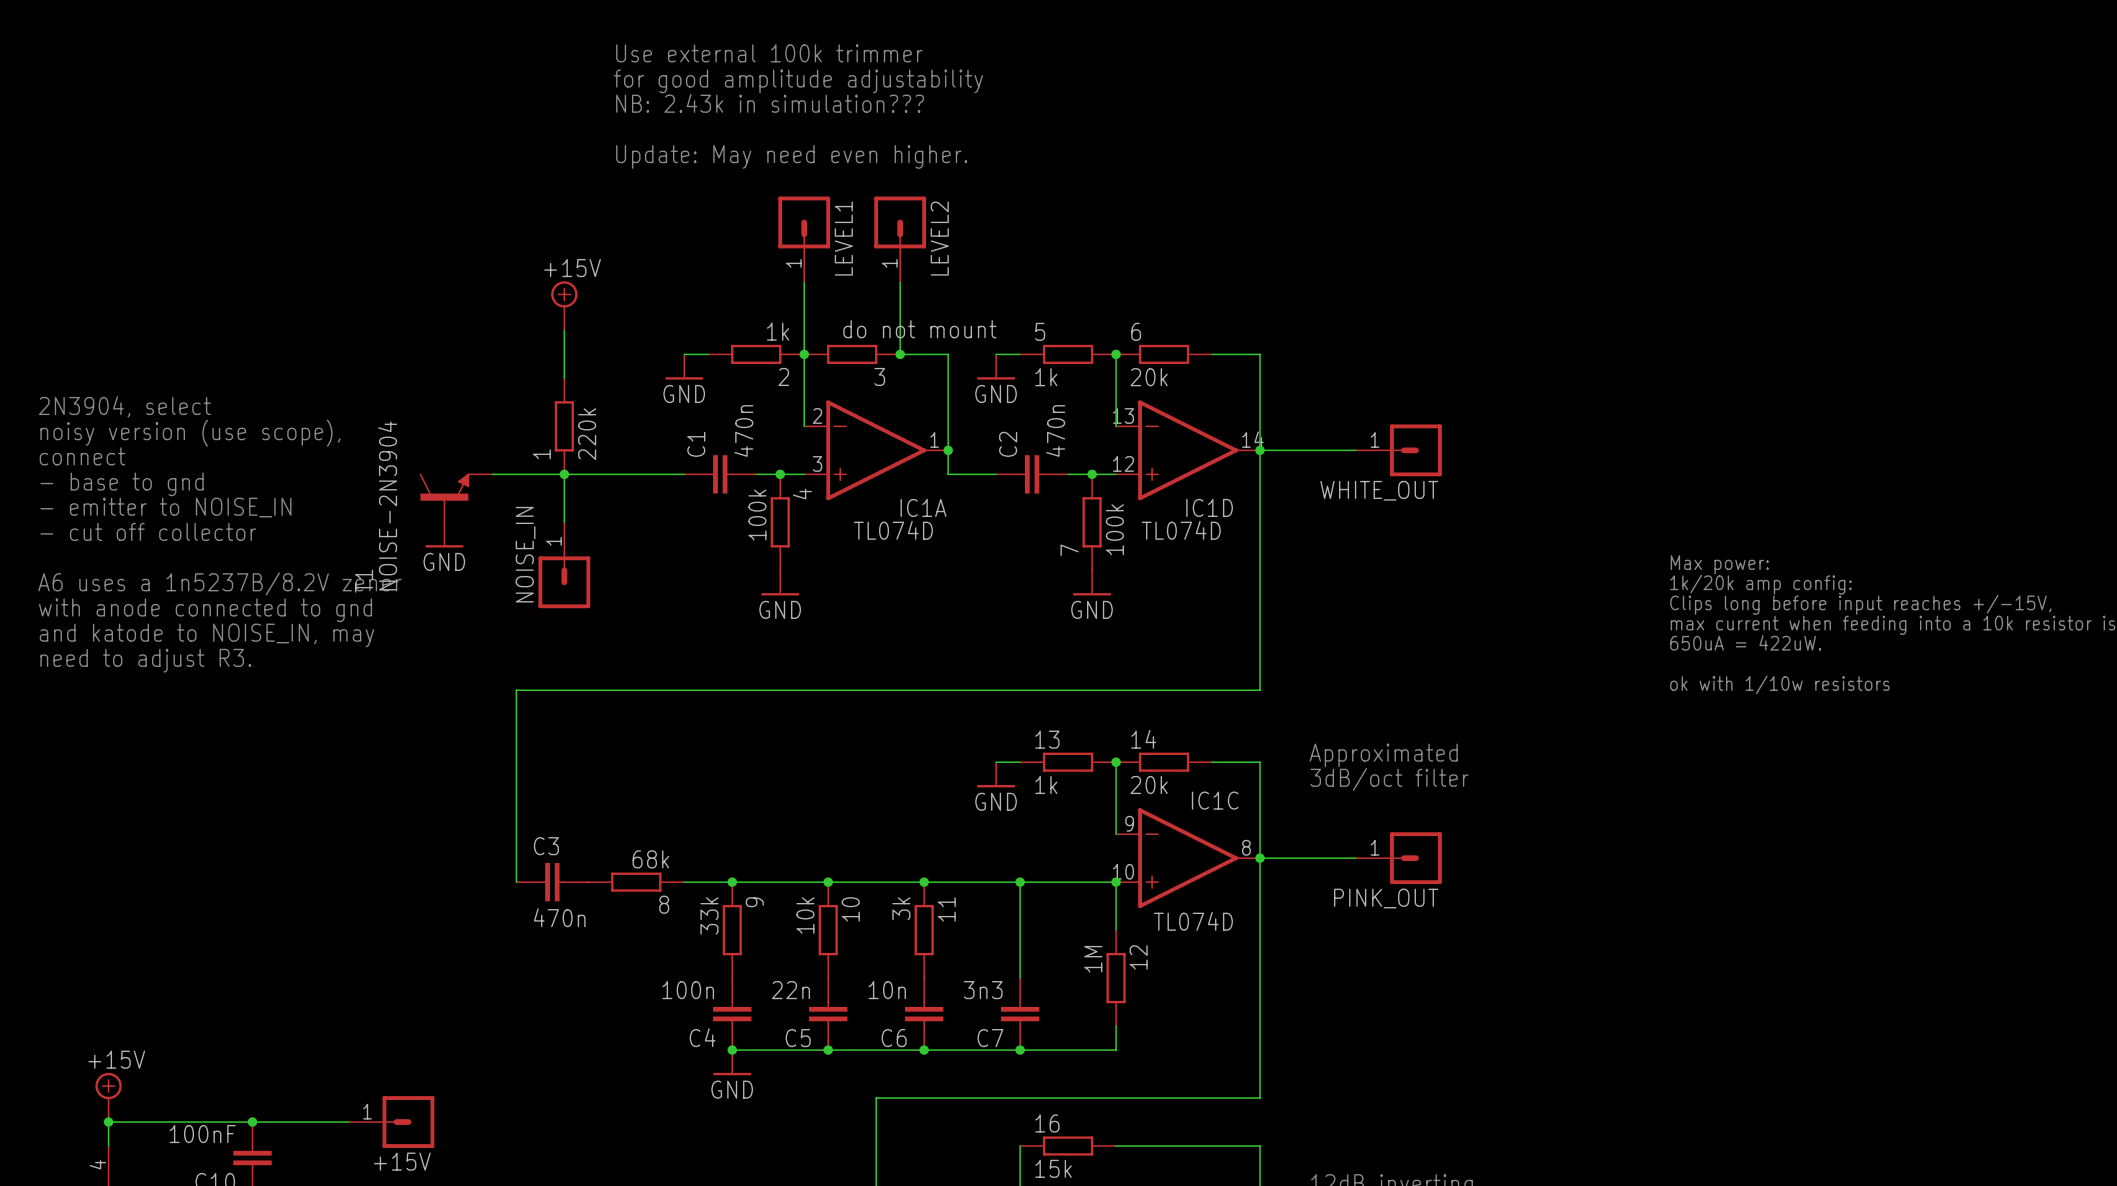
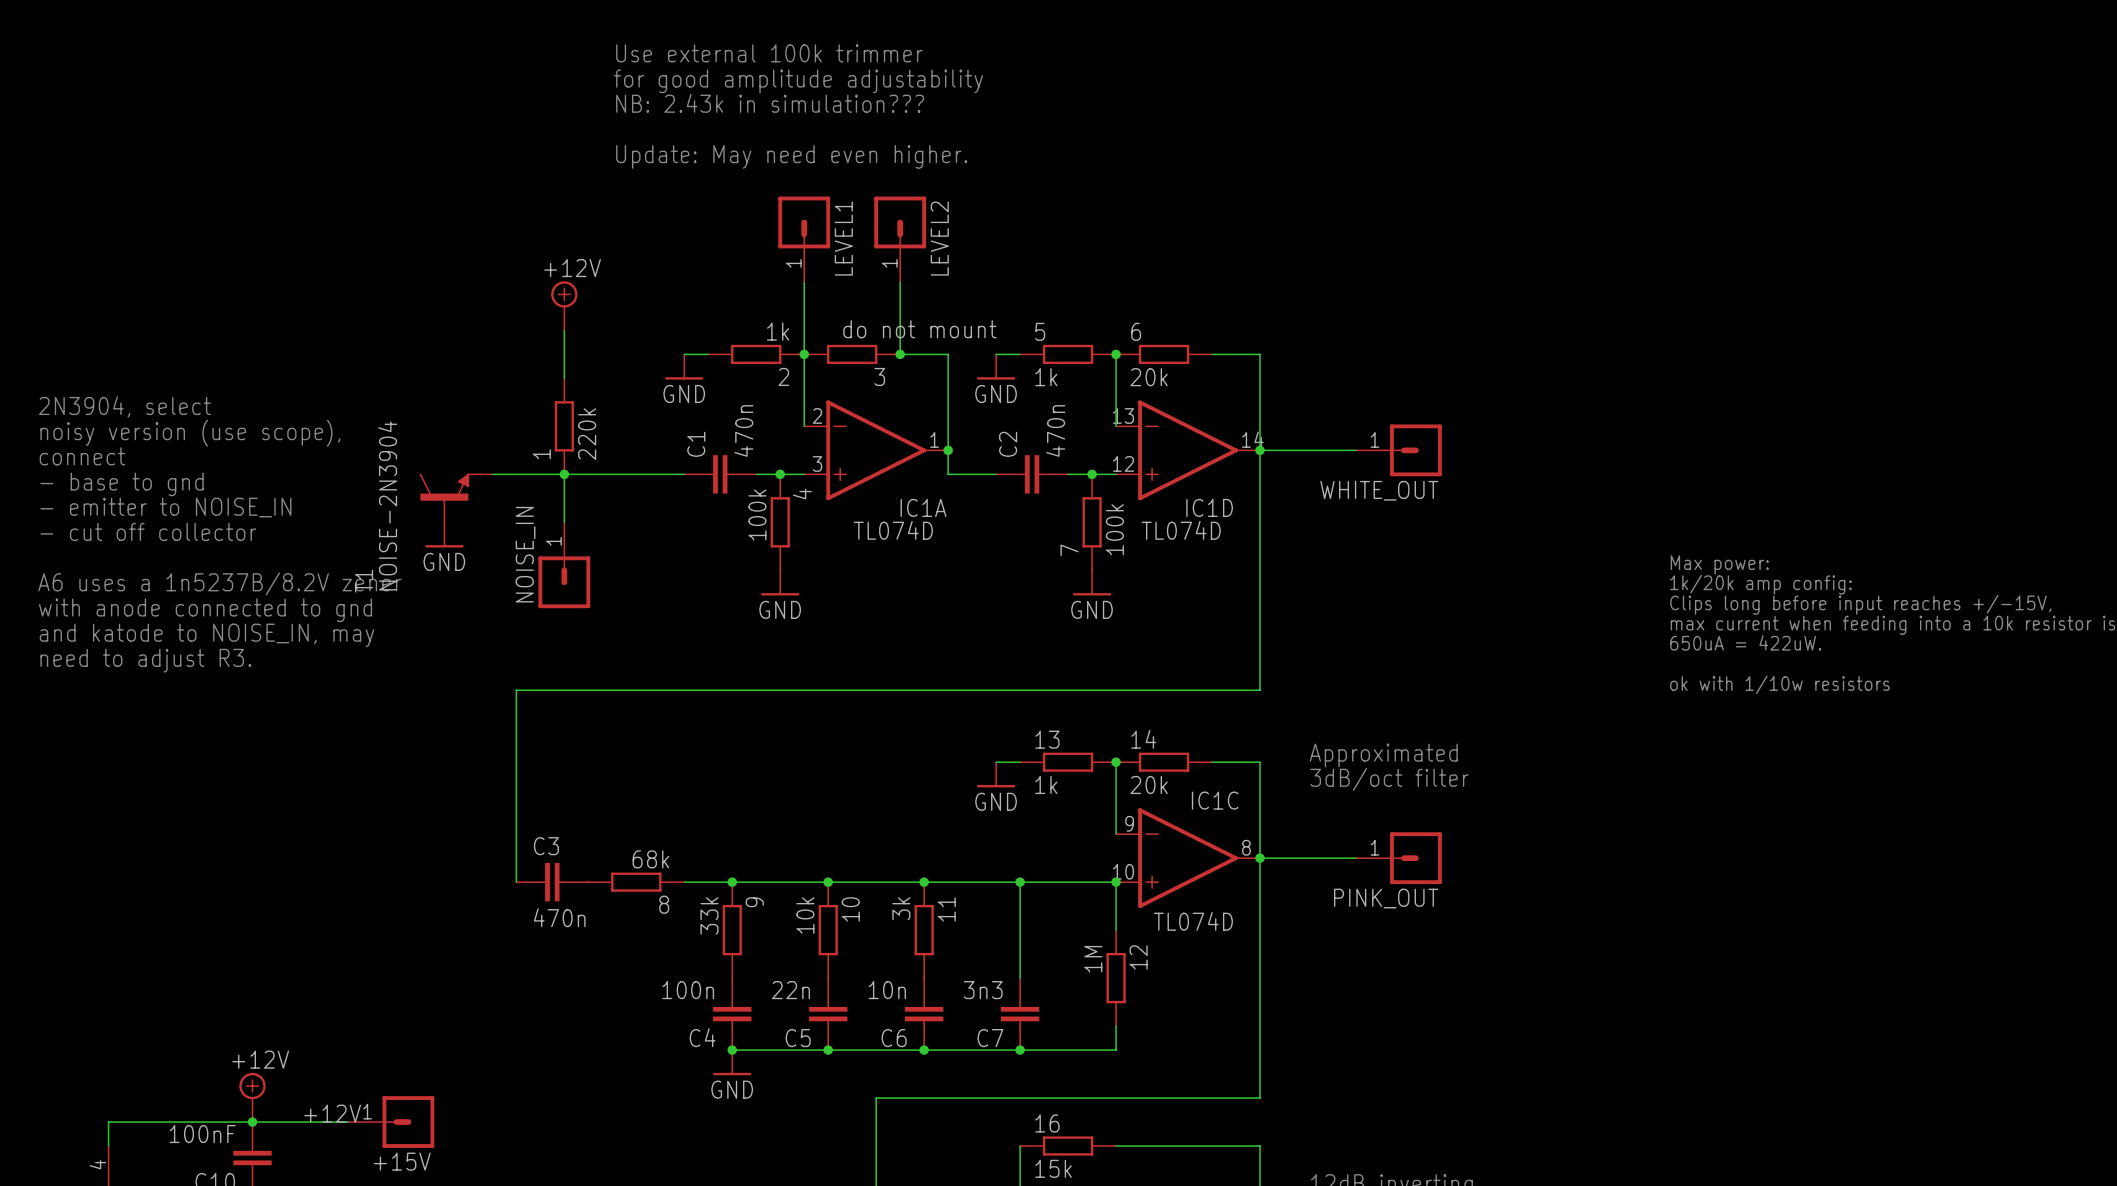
power symbol: +15V (564, 305) -> +12V (564, 305)
power symbol: +15V (108, 1097) -> none
power symbol: none -> +12V (252, 1097)
label: none -> +12V (332, 1113)
junction: (108, 1122) -> none

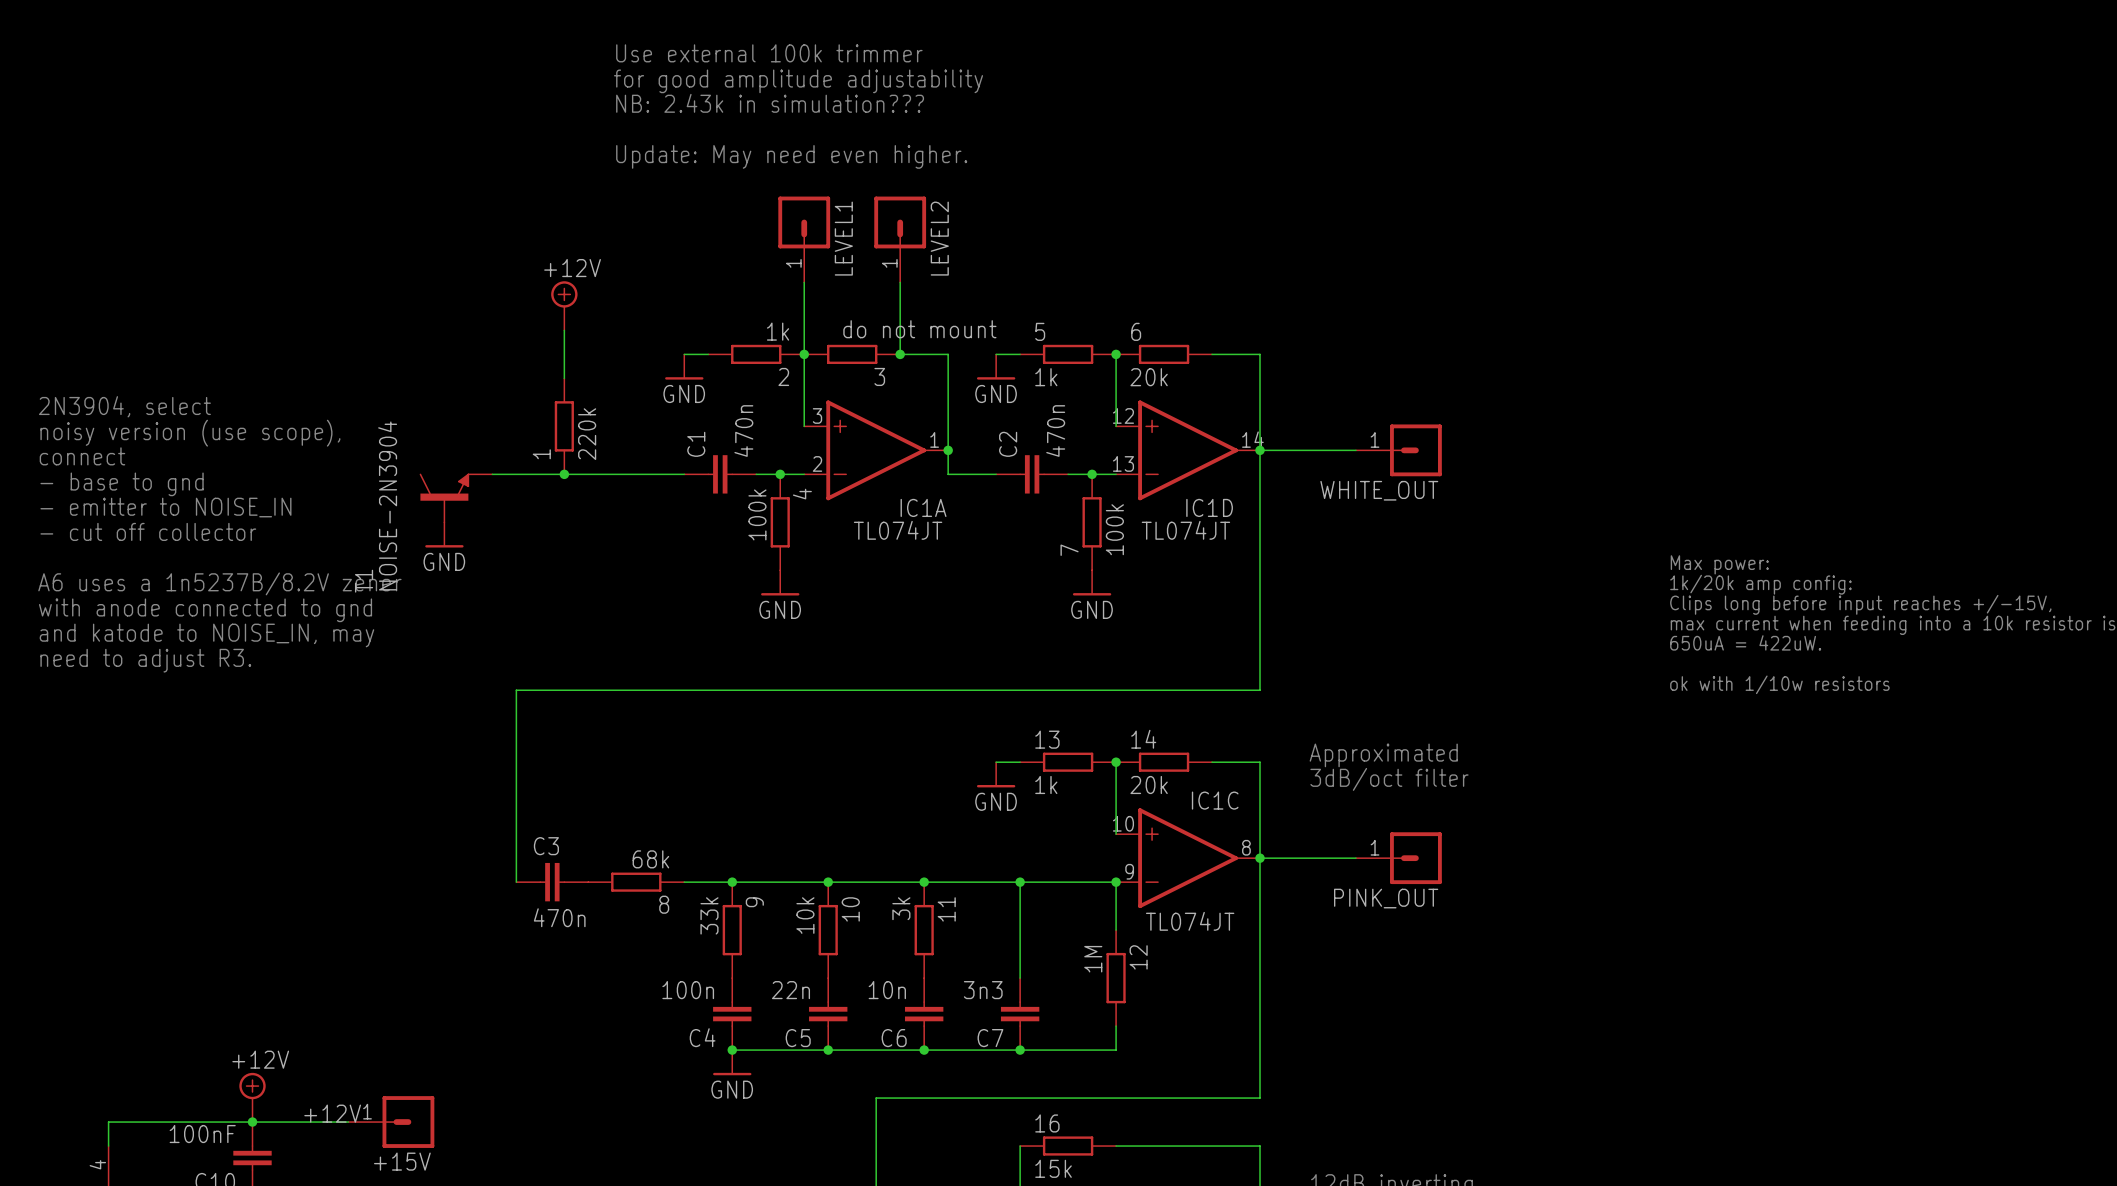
IC1A flip: as is (876, 450) -> up-down (876, 450)
IC1D flip: as is (1188, 450) -> up-down (1188, 450)
wire: (564, 474) (564, 522) -> none
IC1A value: TL074D (893, 530) -> TL074JT (898, 530)
IC1D value: TL074D (1181, 530) -> TL074JT (1185, 530)
NOISE_IN: (564, 565) -> none
IC1C flip: as is (1188, 858) -> up-down (1188, 858)
IC1C value: TL074D (1193, 921) -> TL074JT (1190, 921)

